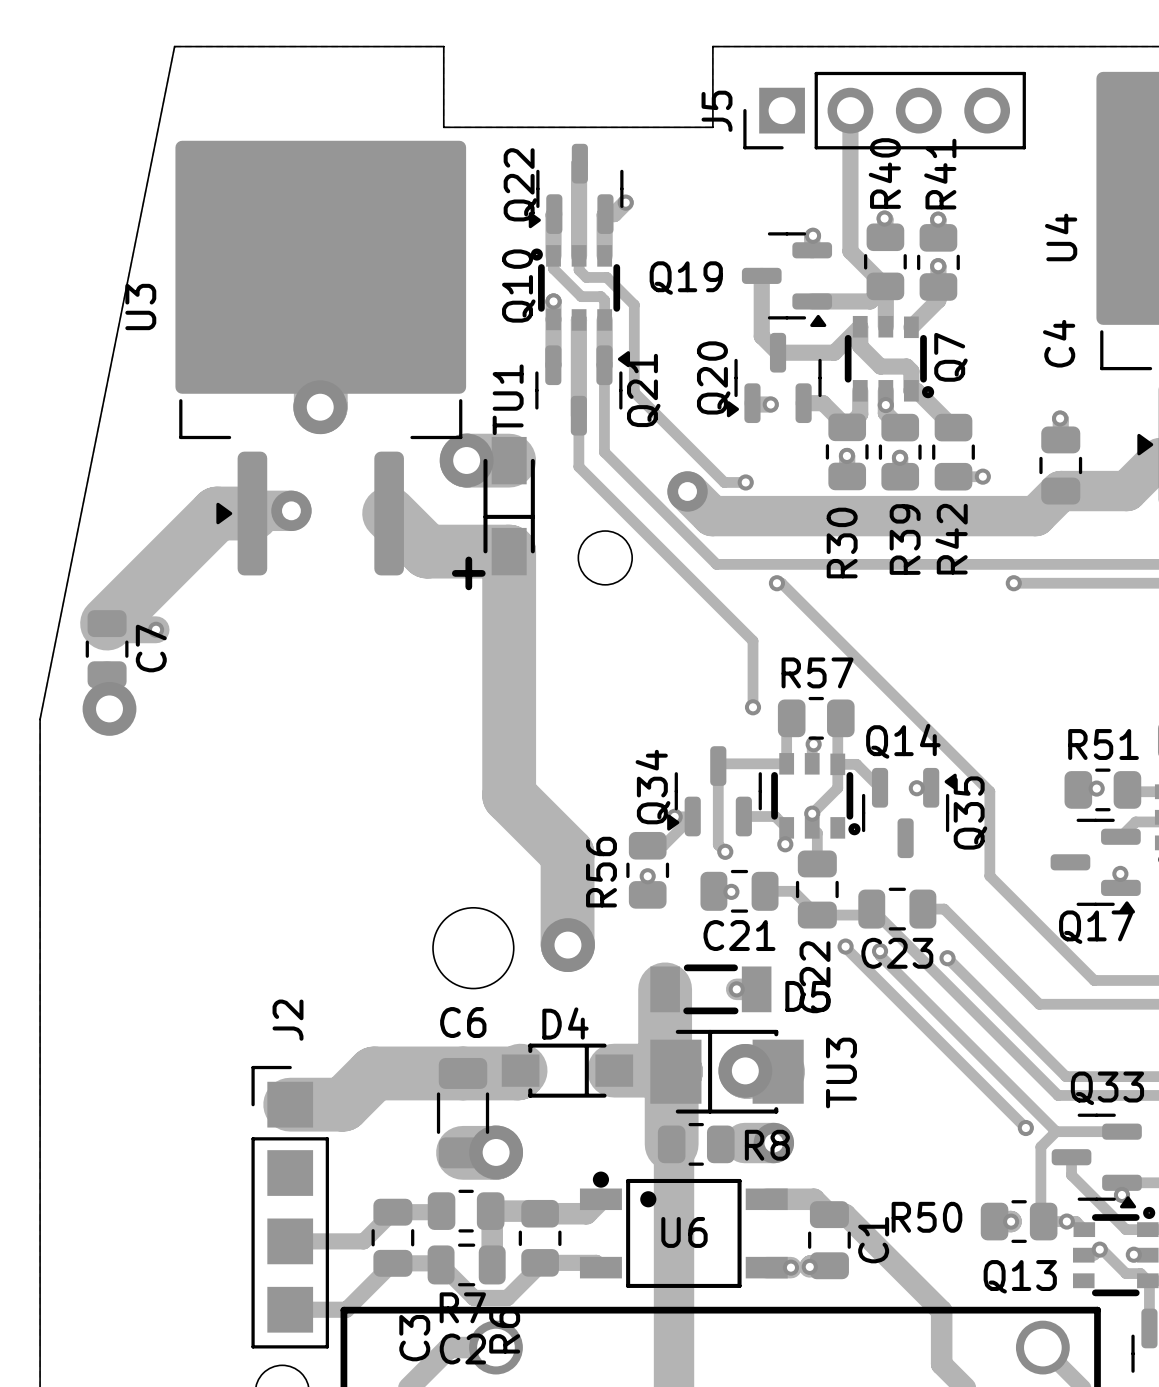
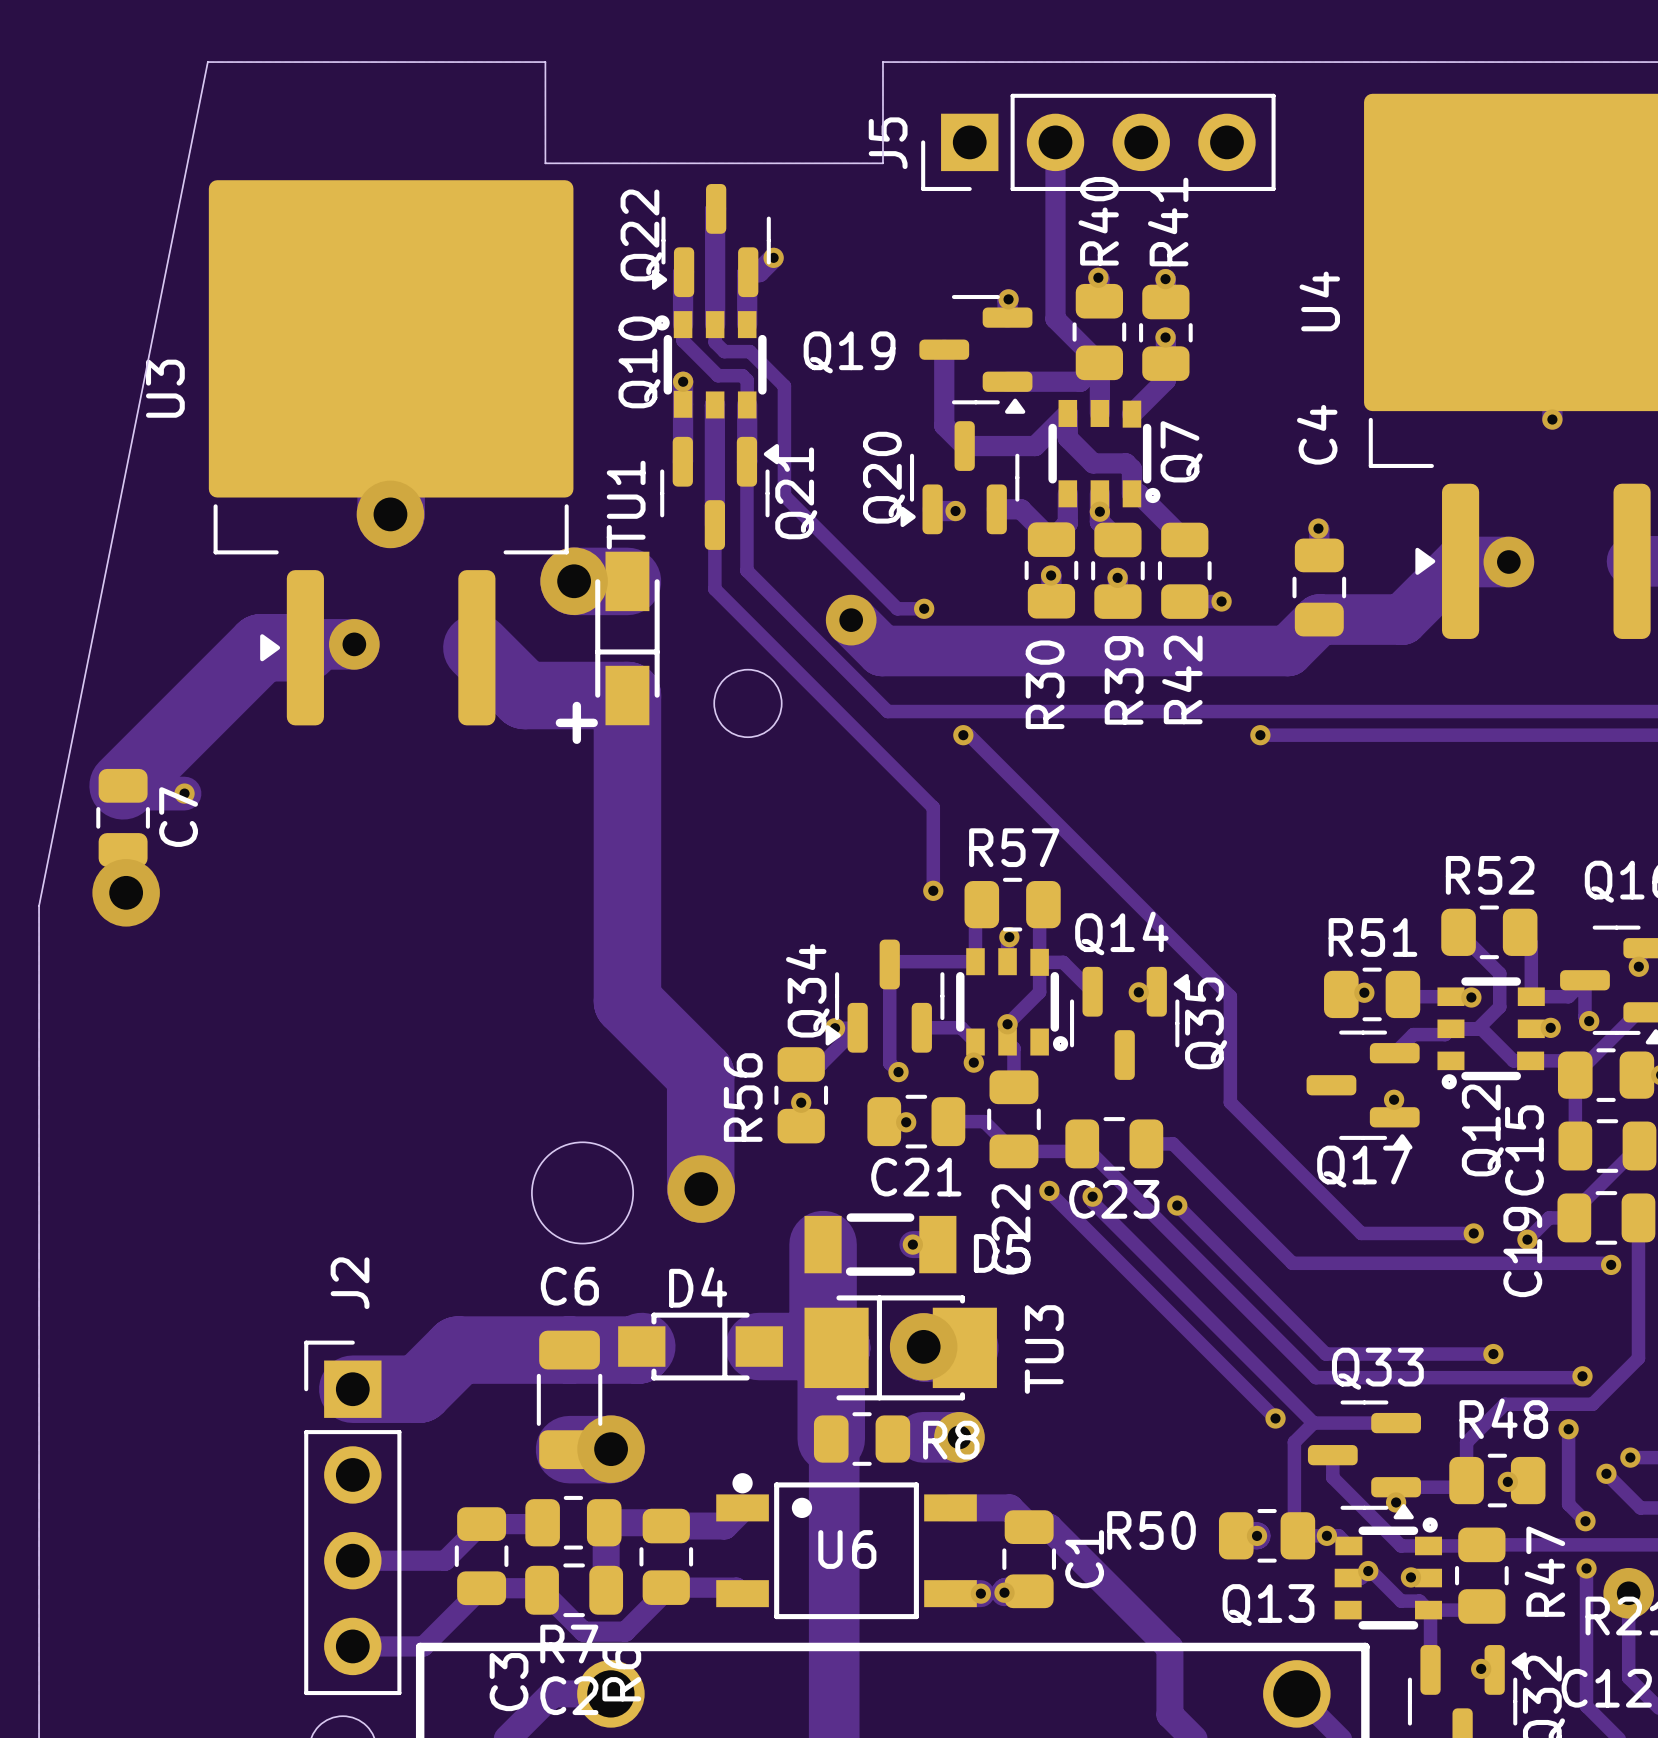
J2 footprint: [251, 1065, 329, 1349] -> [304, 1340, 402, 1696]

